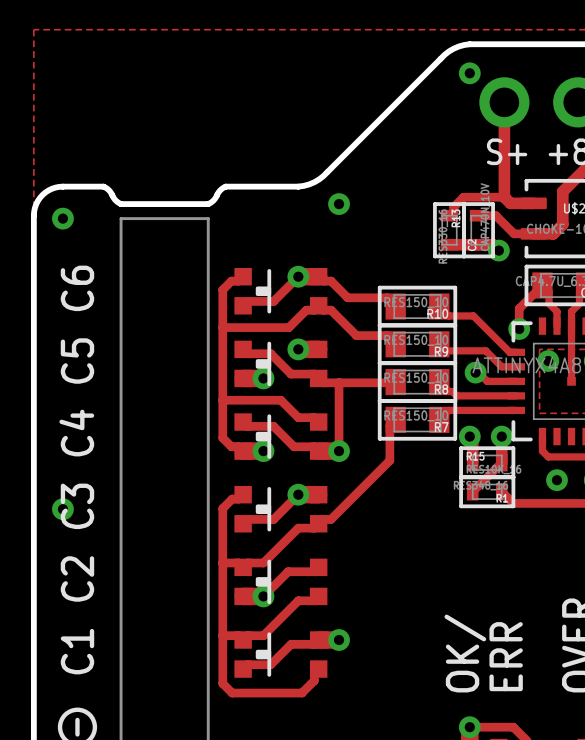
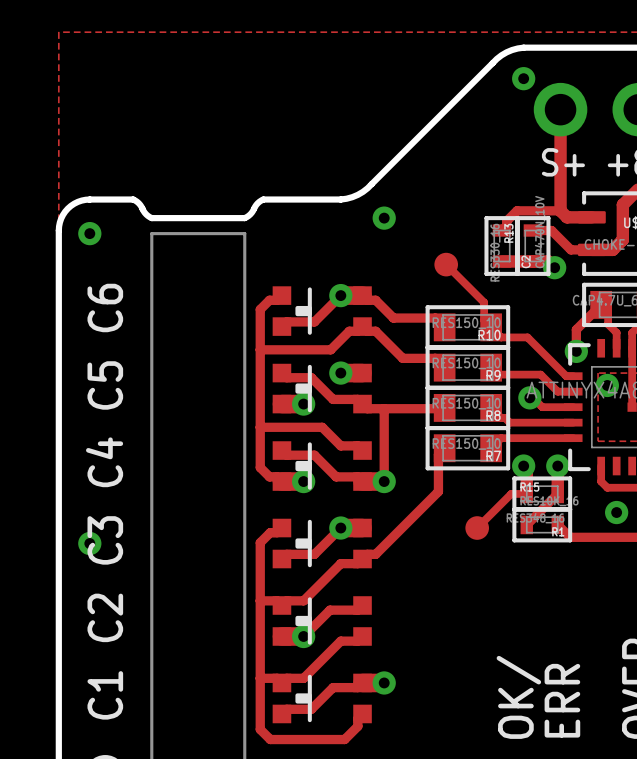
track: none -> (446, 264) (484, 302) (484, 320) (491, 327)
part: none -> (446, 264)
track: none -> (526, 493) (511, 493) (477, 528)
part: none -> (477, 528)

